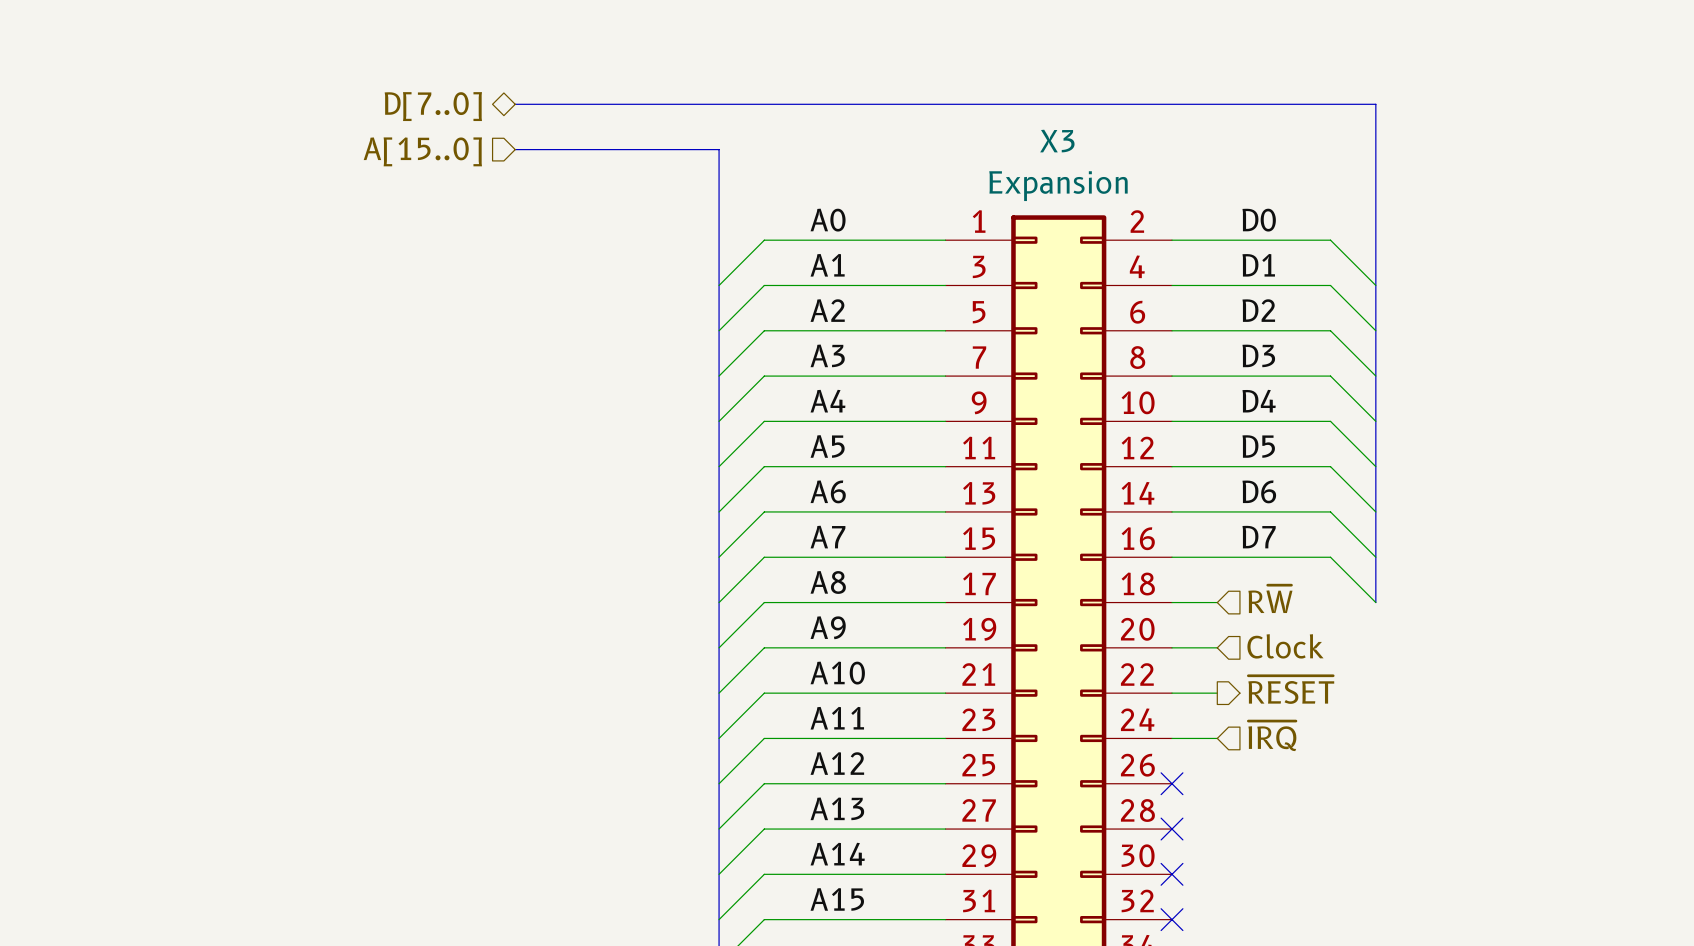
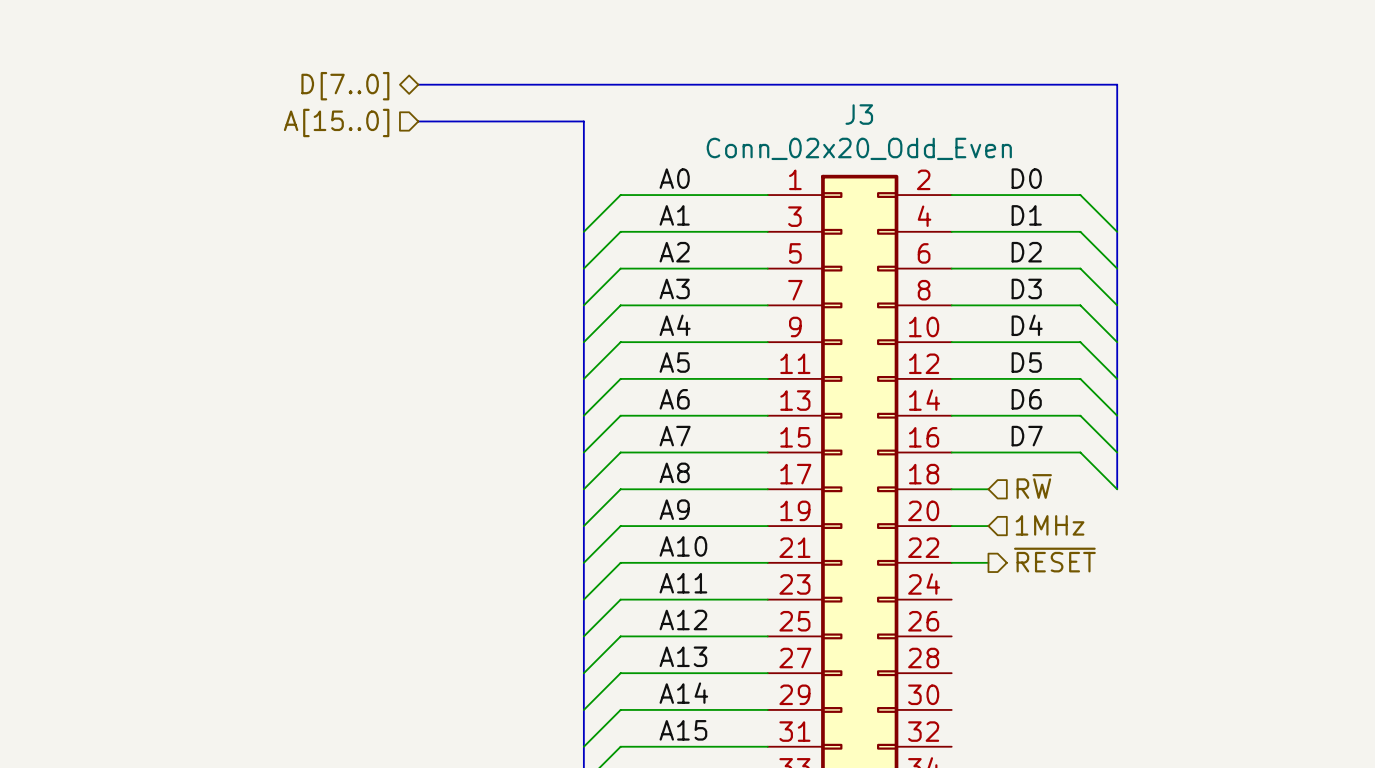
X3 name: X3 (1057, 141) -> J3 (859, 114)
X3 value: Expansion (1058, 186) -> Conn_02x20_Odd_Even (859, 148)
hierarchical label: Clock (1285, 646) -> 1MHz (1050, 525)
hierarchical label: ~{IRQ} (1272, 736) -> none
wire: (1172, 738) (1217, 738) -> none
no-connect mark: (1172, 783) -> none
no-connect mark: (1172, 829) -> none
no-connect mark: (1172, 874) -> none
no-connect mark: (1172, 919) -> none

